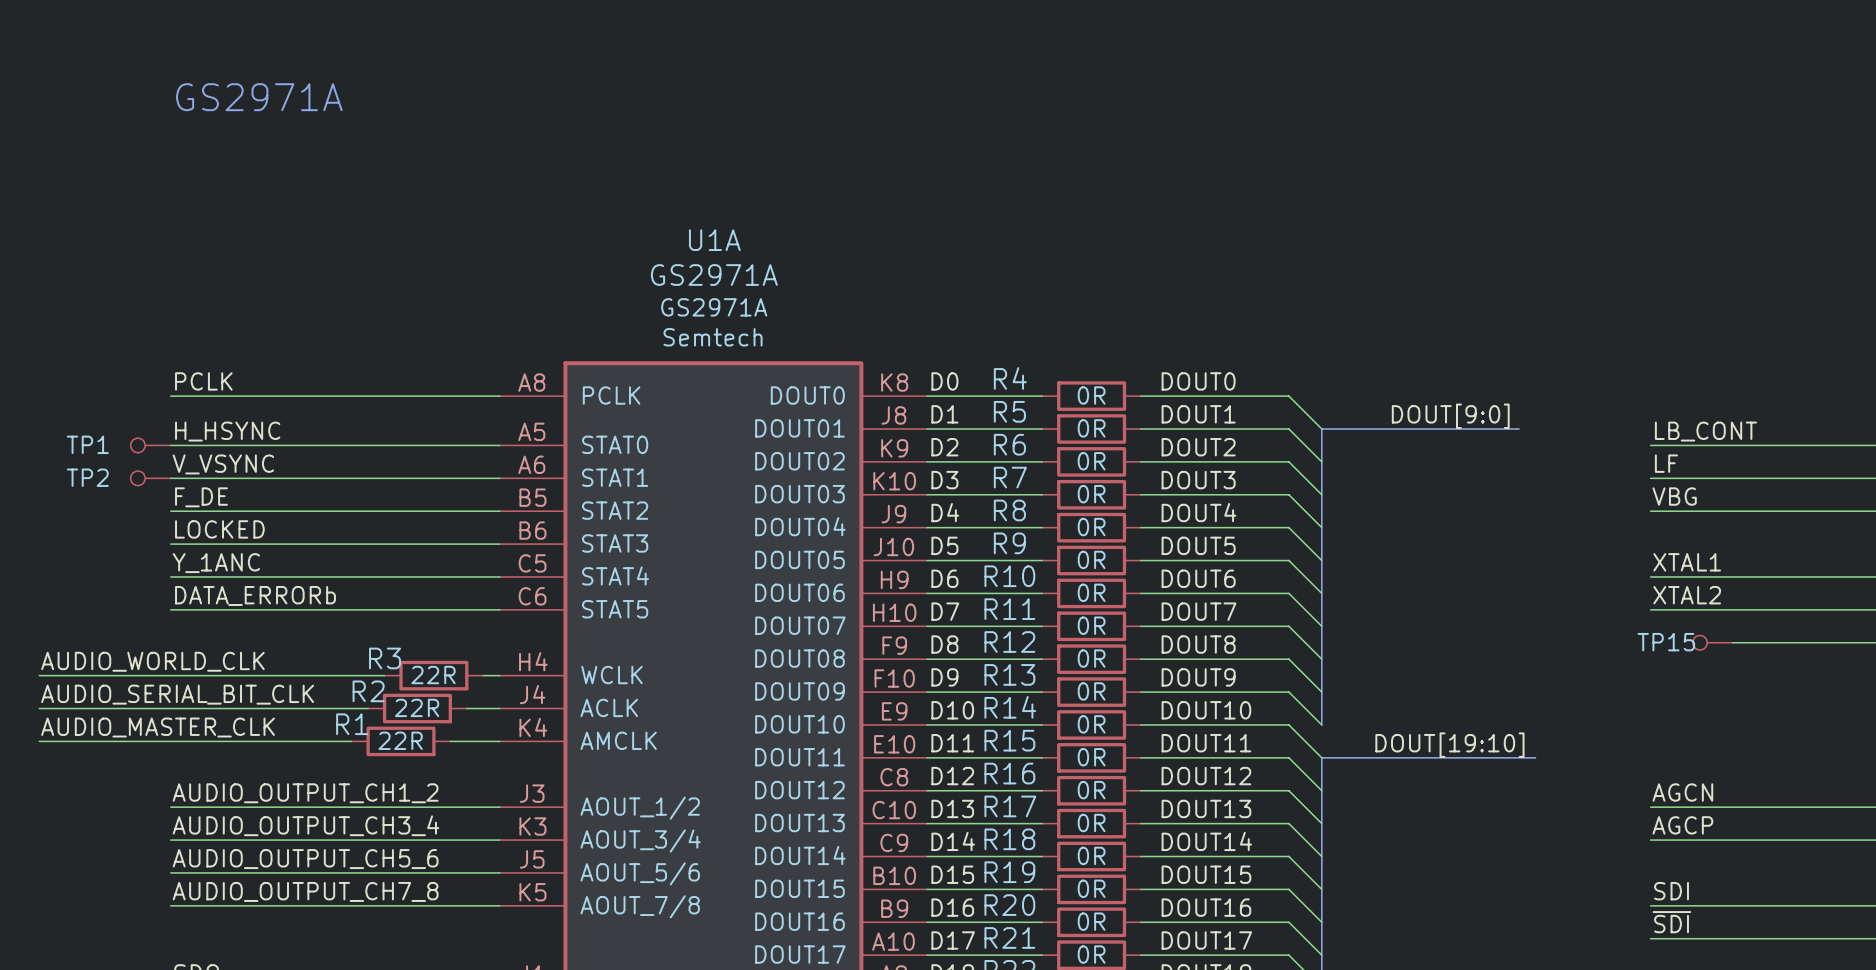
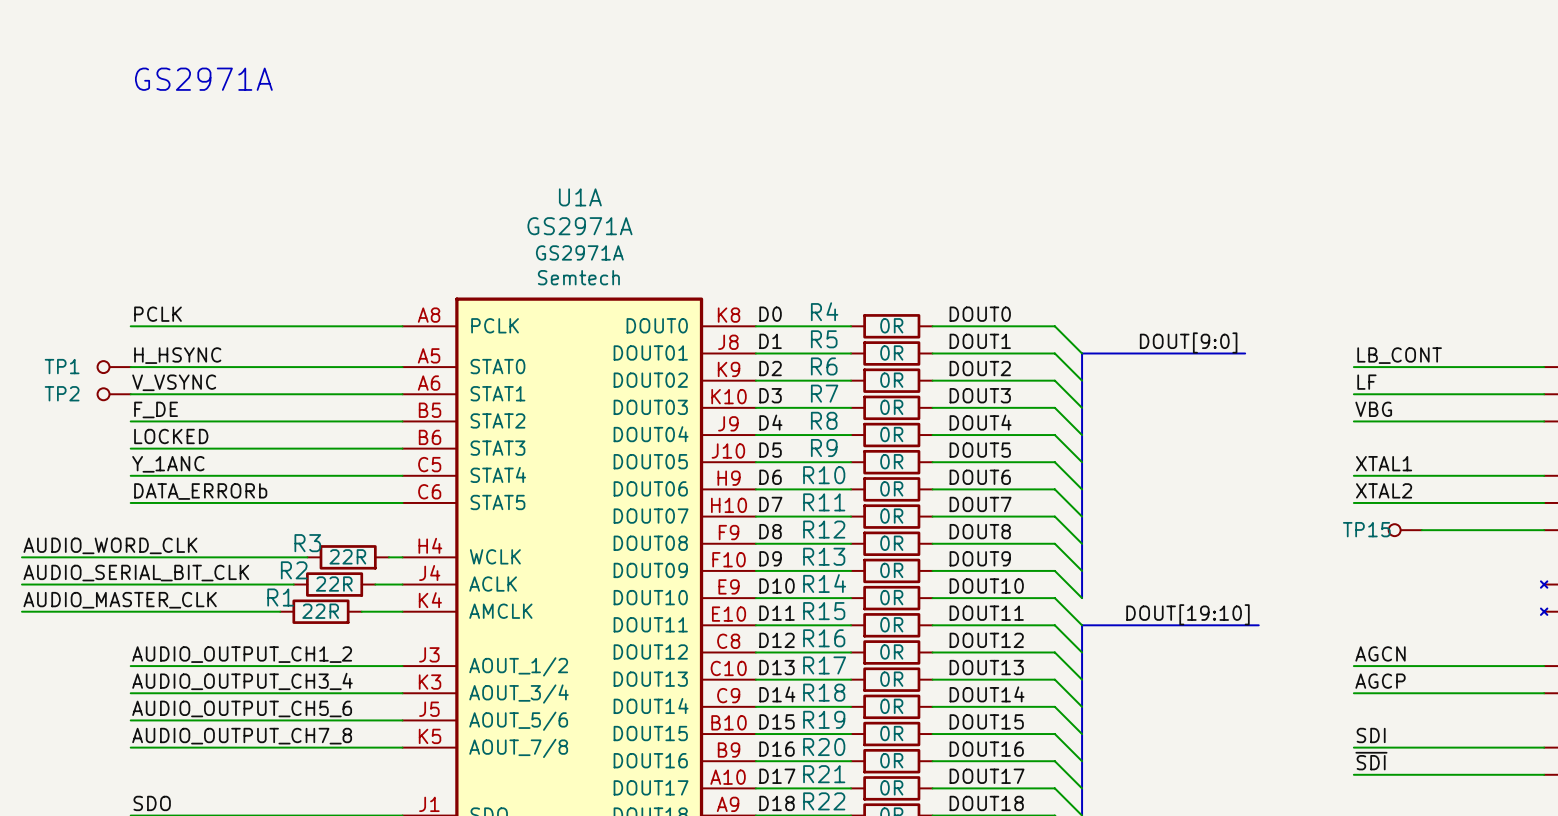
label: AUDIO_WORLD_CLK (152, 661) -> AUDIO_WORD_CLK (110, 545)

